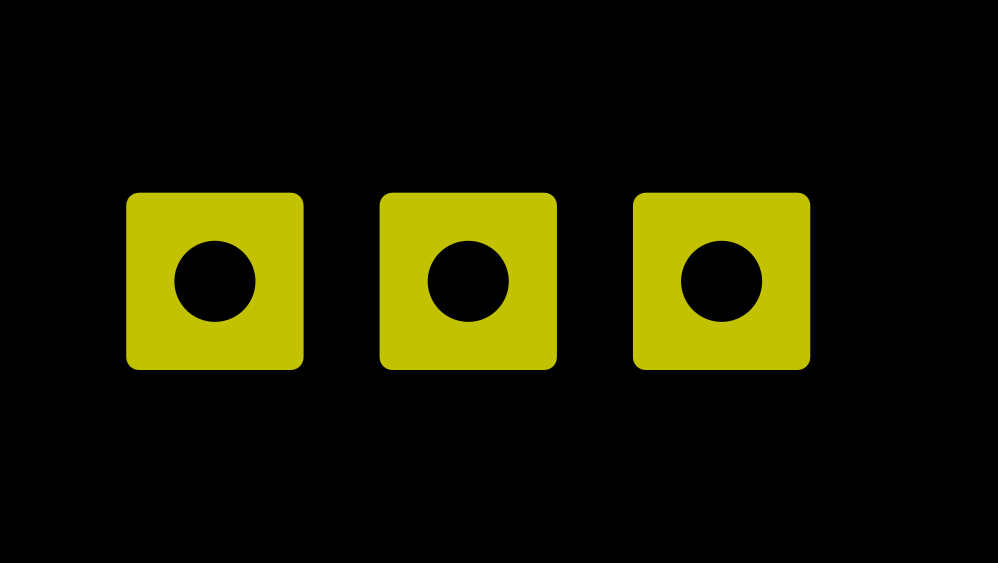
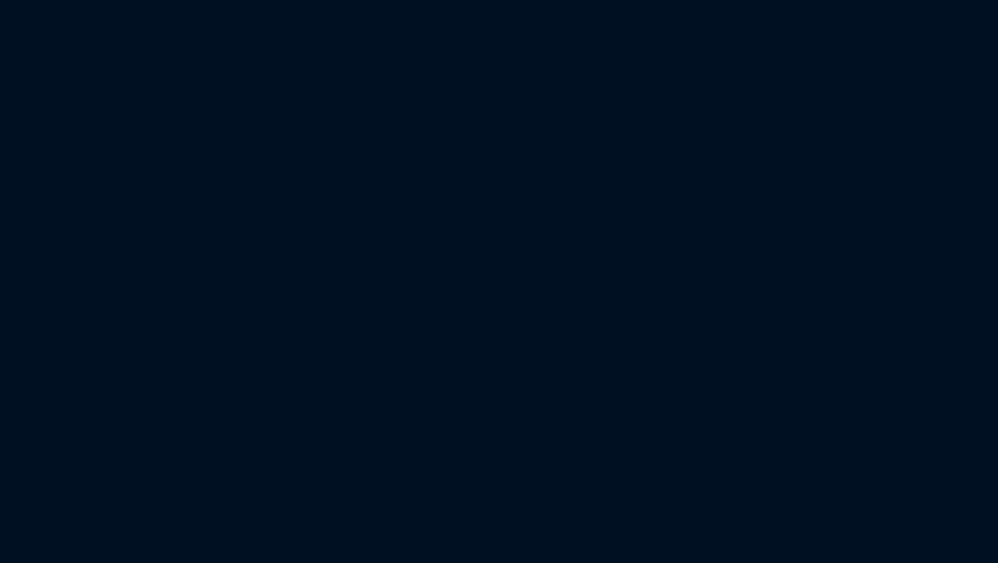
part: (214, 281) -> none
part: (468, 281) -> none
part: (721, 281) -> none

